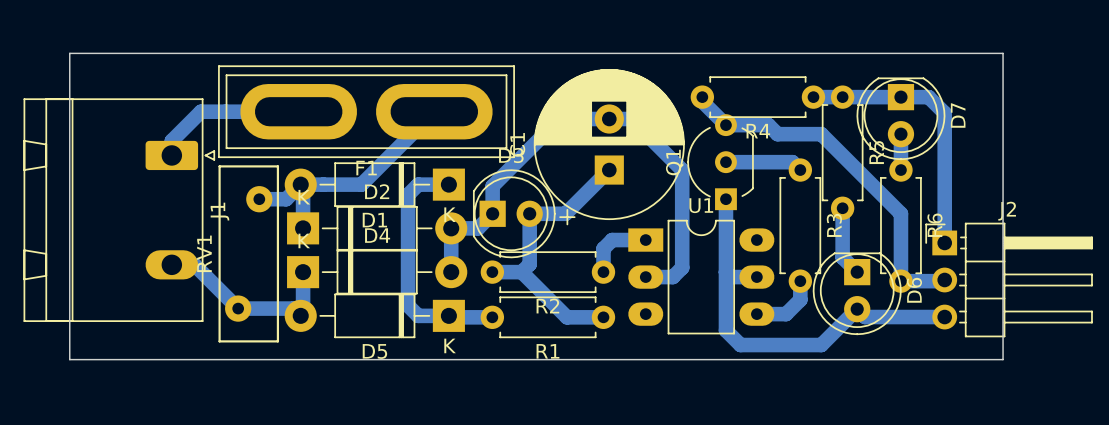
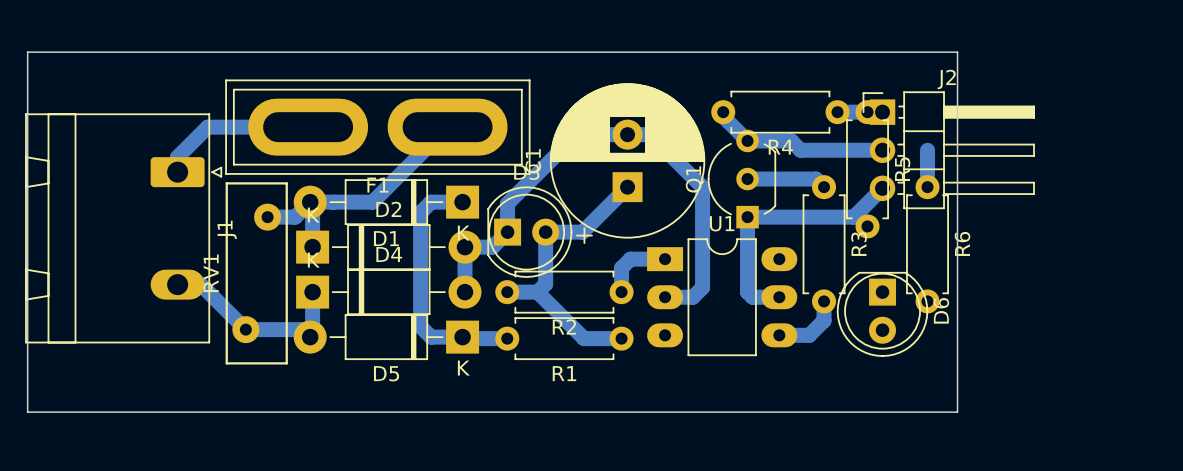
board edge: (69, 53) (1003, 53) (1003, 359) (69, 359) (69, 53) -> (27, 52) (27, 412) (957, 412) (957, 52) (27, 52)
bottom track: (857, 97) (928, 97) (944, 113) (944, 242) -> none
D7: (900, 118) -> none
bottom track: (821, 134) (900, 213) (900, 281) (944, 280) -> (845, 150) (882, 150)
bottom track: none -> (882, 188) (853, 217) (747, 217)
bottom track: (842, 208) (842, 257) (857, 272) -> none
bottom track: (725, 272) (725, 330) (740, 345) (821, 345) (857, 309) (865, 317) (944, 317) -> none
J2 position: (1009, 280) -> (948, 150)

